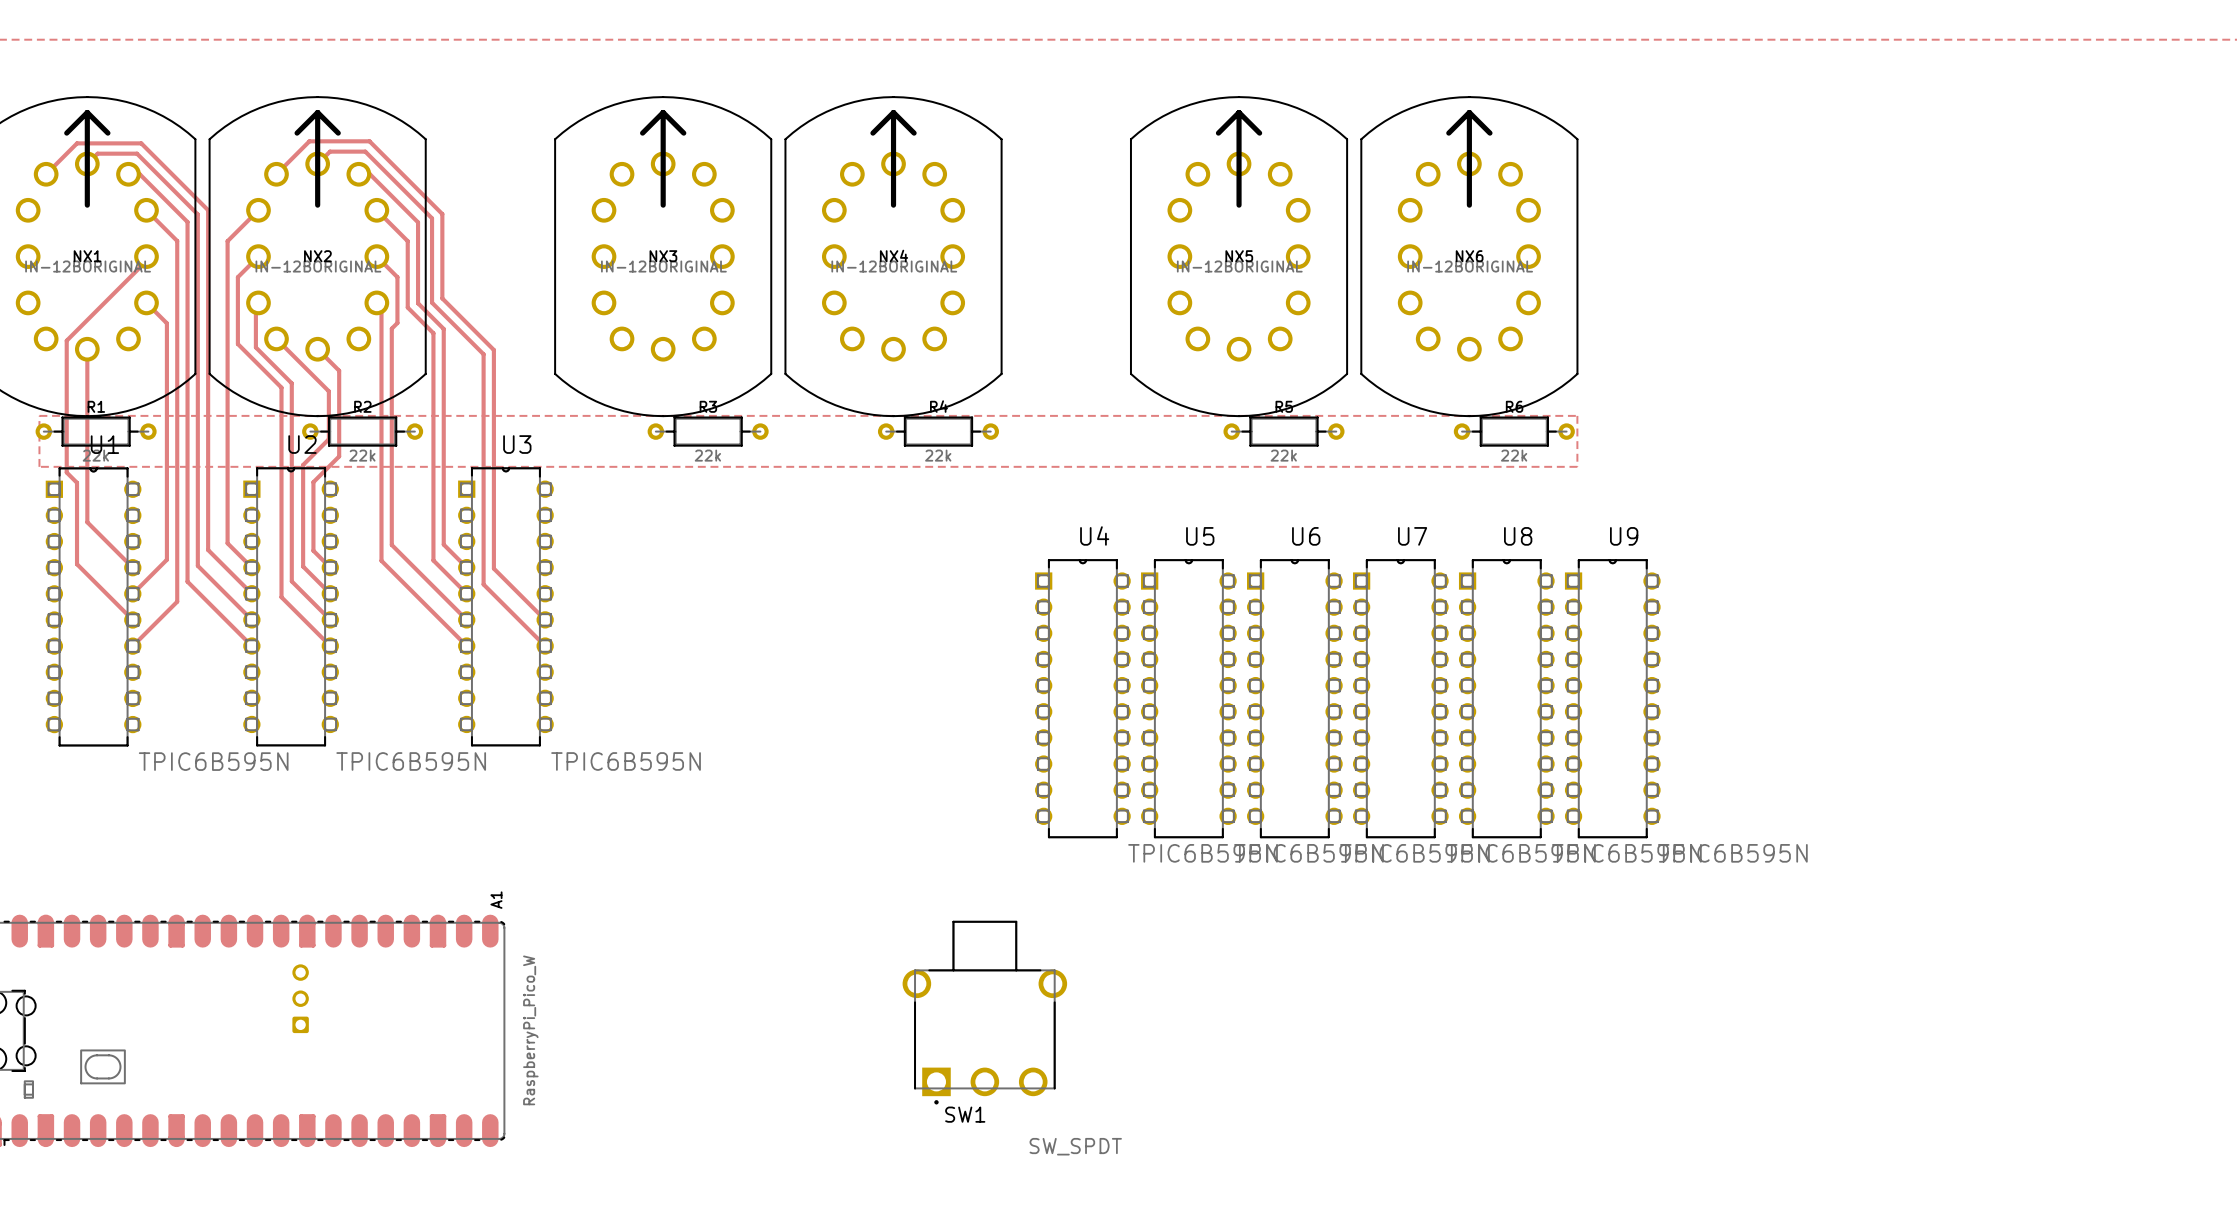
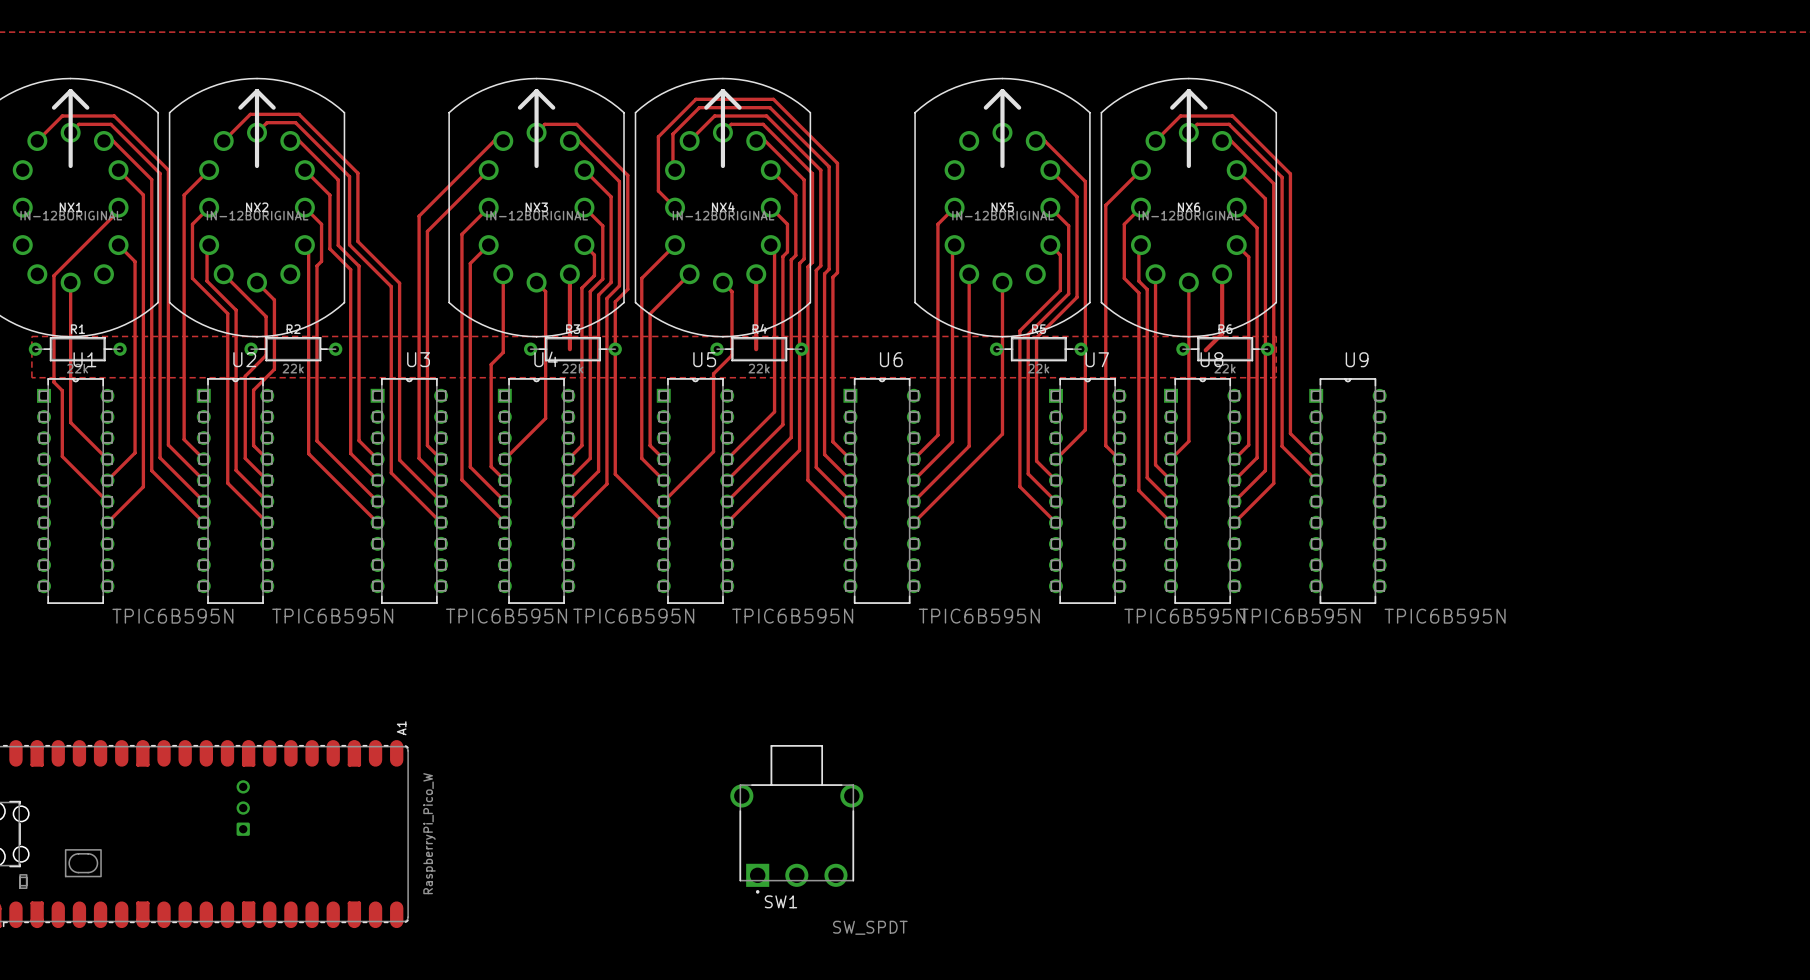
track: none -> (536, 132) (544, 124) (576, 124) (627, 175) (627, 289) (615, 301) (615, 474) (663, 522)
track: none -> (722, 132) (731, 124) (763, 124) (812, 173) (812, 262) (807, 266) (807, 480) (850, 522)
track: none -> (1188, 132) (1197, 124) (1229, 124) (1282, 177) (1282, 446) (1316, 480)
track: none -> (503, 141) (494, 141) (419, 216) (419, 458) (441, 480)
track: none -> (569, 141) (578, 141) (619, 181) (619, 285) (606, 298) (606, 484) (568, 522)
track: none -> (689, 141) (714, 116) (766, 116) (820, 170) (820, 265) (816, 270) (816, 467) (850, 501)
track: none -> (756, 141) (765, 141) (804, 179) (804, 258) (799, 263) (799, 450) (727, 522)
track: none -> (1035, 141) (1044, 141) (1085, 181) (1085, 429) (1055, 459)
track: none -> (1155, 141) (1180, 116) (1232, 116) (1290, 173) (1290, 433) (1316, 459)
track: none -> (1222, 141) (1231, 141) (1273, 183) (1273, 483) (1234, 522)
track: none -> (488, 170) (427, 231) (427, 445) (441, 459)
track: none -> (584, 170) (611, 196) (611, 282) (598, 295) (598, 471) (568, 501)
track: none -> (675, 170) (672, 168) (672, 134) (699, 107) (770, 107) (829, 166) (829, 269) (824, 273) (824, 454) (850, 480)
track: none -> (770, 170) (795, 195) (795, 255) (791, 260) (791, 437) (727, 501)
track: none -> (1050, 170) (1077, 196) (1077, 297) (1036, 337) (1036, 461) (1055, 480)
track: none -> (1140, 170) (1105, 205) (1105, 445) (1119, 459)
track: none -> (1236, 170) (1265, 198) (1265, 470) (1234, 501)
track: none -> (488, 207) (461, 234) (461, 479) (504, 522)
track: none -> (584, 207) (602, 225) (602, 279) (590, 291) (590, 458) (568, 480)
track: none -> (675, 207) (658, 190) (658, 136) (695, 99) (773, 99) (837, 163) (837, 272) (832, 277) (832, 441) (850, 459)
track: none -> (770, 207) (787, 224) (787, 251) (782, 256) (782, 424) (727, 480)
track: none -> (954, 207) (937, 224) (937, 435) (913, 459)
track: none -> (1050, 207) (1068, 225) (1068, 293) (1028, 334) (1028, 473) (1055, 501)
track: none -> (1140, 207) (1124, 224) (1124, 278) (1138, 292) (1138, 490) (1171, 522)
track: none -> (1236, 207) (1257, 227) (1257, 457) (1234, 480)
track: none -> (488, 245) (470, 263) (470, 467) (504, 501)
track: none -> (584, 245) (594, 255) (594, 275) (581, 288)
track: none -> (675, 245) (641, 278) (641, 458) (663, 480)
track: none -> (770, 245) (774, 248) (774, 411) (727, 459)
track: none -> (954, 245) (952, 247) (952, 441) (913, 480)
track: none -> (1050, 245) (1060, 255) (1060, 290) (1019, 330) (1019, 486) (1055, 522)
track: none -> (1140, 245) (1138, 247) (1138, 281) (1147, 289) (1147, 477) (1171, 501)
track: none -> (1236, 245) (1248, 257) (1248, 444) (1234, 459)
track: none -> (503, 274) (503, 352) (491, 364) (491, 466) (504, 480)
track: none -> (569, 274) (569, 349)
track: none -> (689, 274) (650, 313) (650, 445) (663, 459)
track: none -> (969, 274) (969, 446) (913, 501)
track: none -> (1155, 274) (1155, 464) (1171, 480)
track: none -> (1222, 274) (1222, 333) (1205, 350)
track: none -> (756, 274) (756, 349)
track: none -> (536, 282) (545, 291) (545, 418) (504, 459)
track: none -> (722, 282) (732, 291) (732, 355) (713, 373) (713, 451) (663, 501)
track: none -> (1002, 282) (1002, 434) (913, 522)
track: none -> (1188, 282) (1188, 441) (1171, 459)
track: none -> (581, 288) (581, 445) (568, 459)
U4 position: (1082, 698) -> (536, 490)
U5 position: (1188, 698) -> (695, 490)
U6 position: (1294, 698) -> (882, 490)
U7 position: (1400, 698) -> (1087, 491)
U8 position: (1506, 698) -> (1202, 490)
U9 position: (1612, 698) -> (1347, 491)

